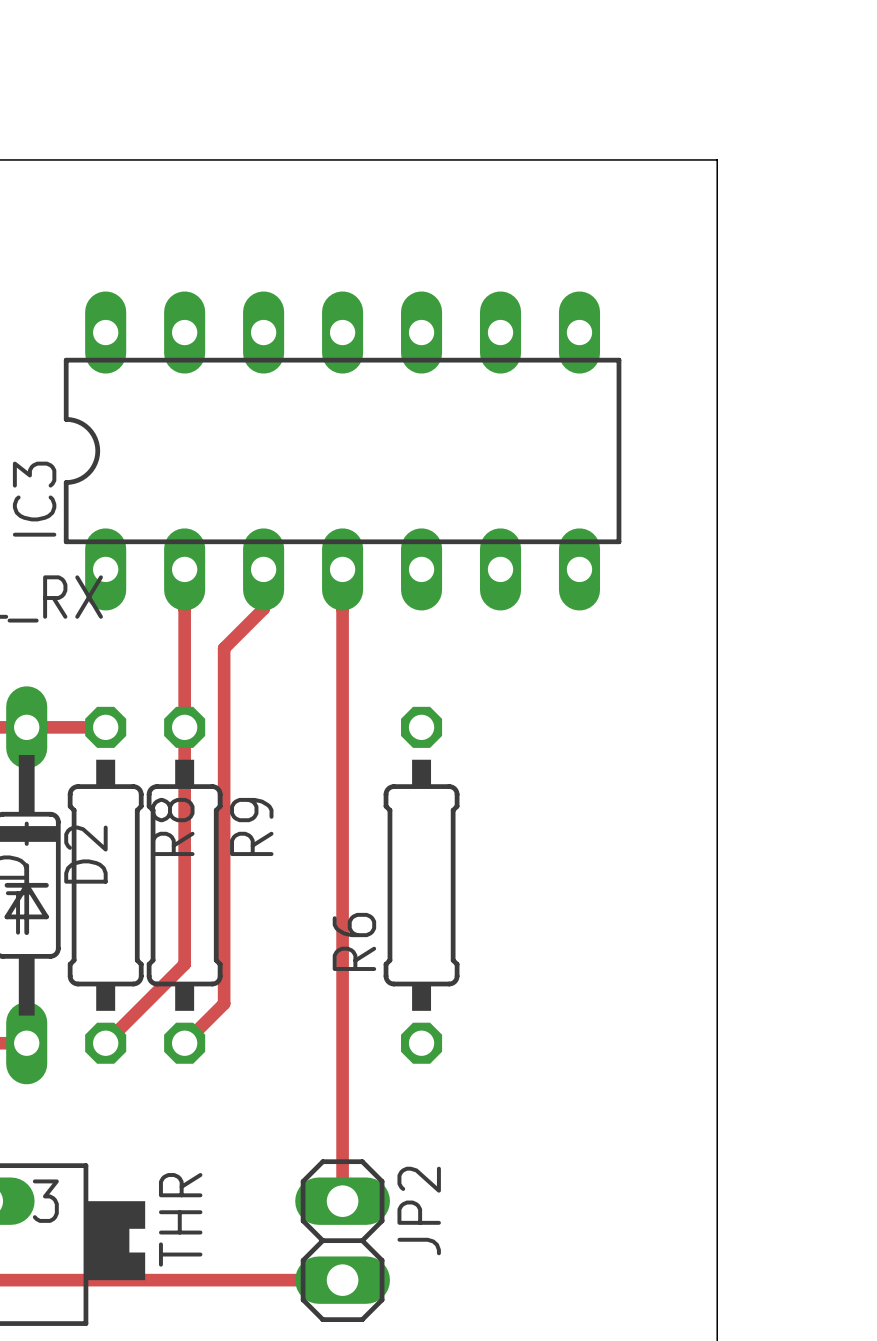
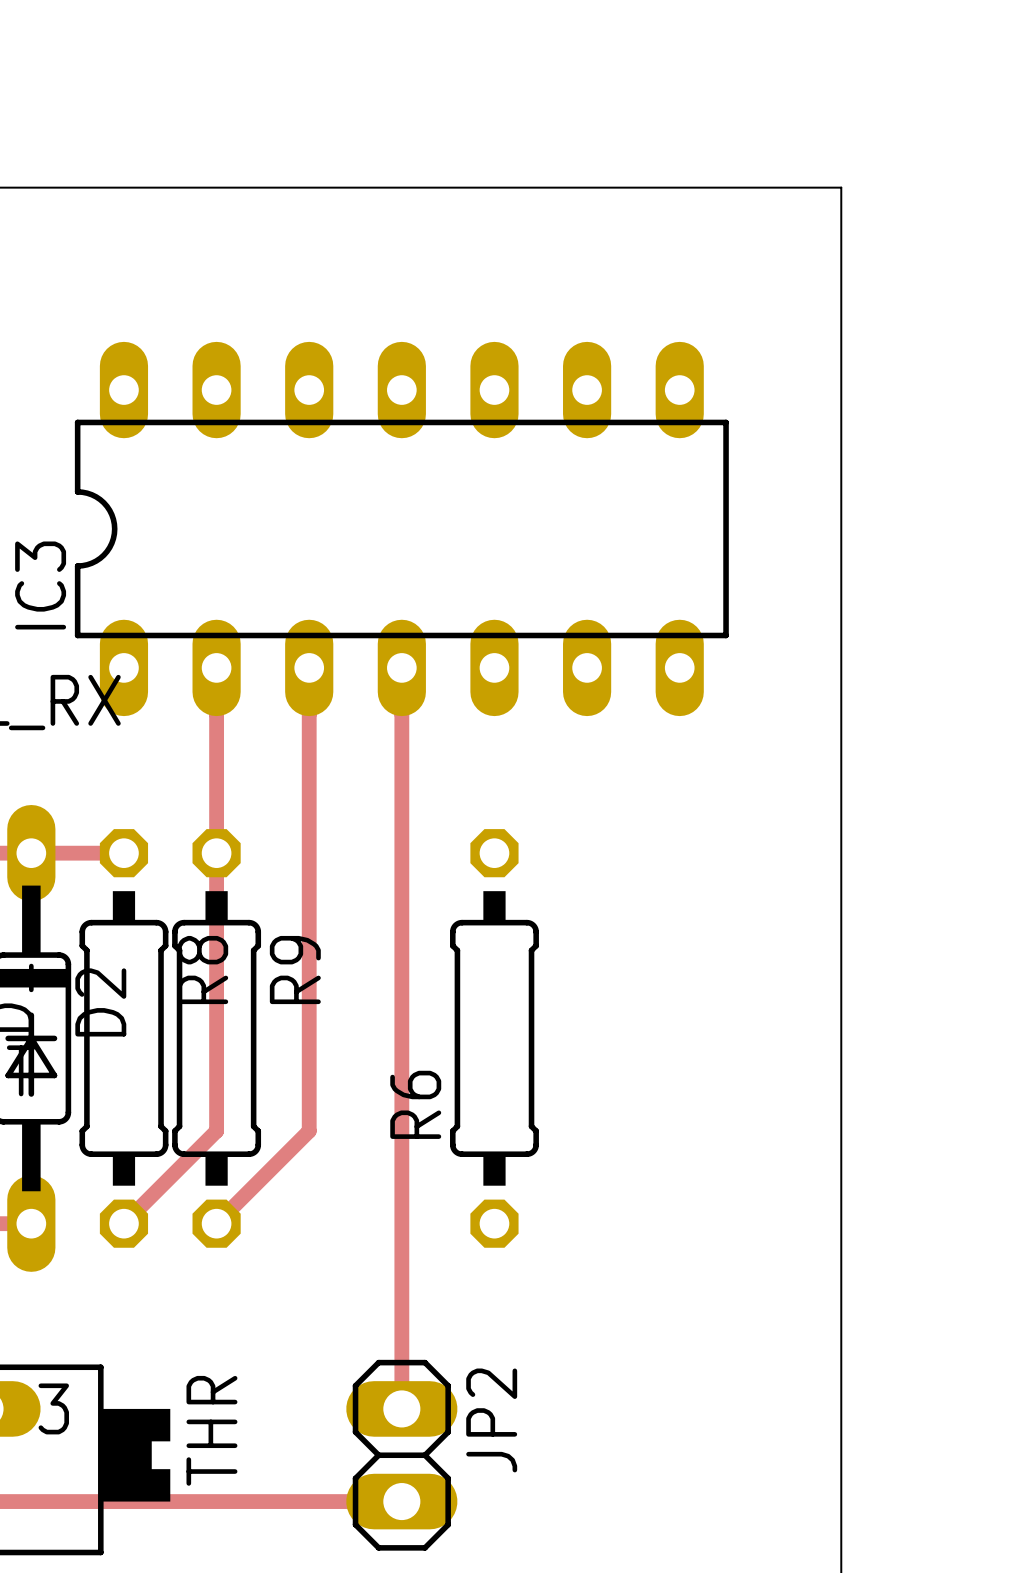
track: (263, 608) (224, 648) (224, 1003) -> (309, 714) (309, 1131) (262, 1177)

